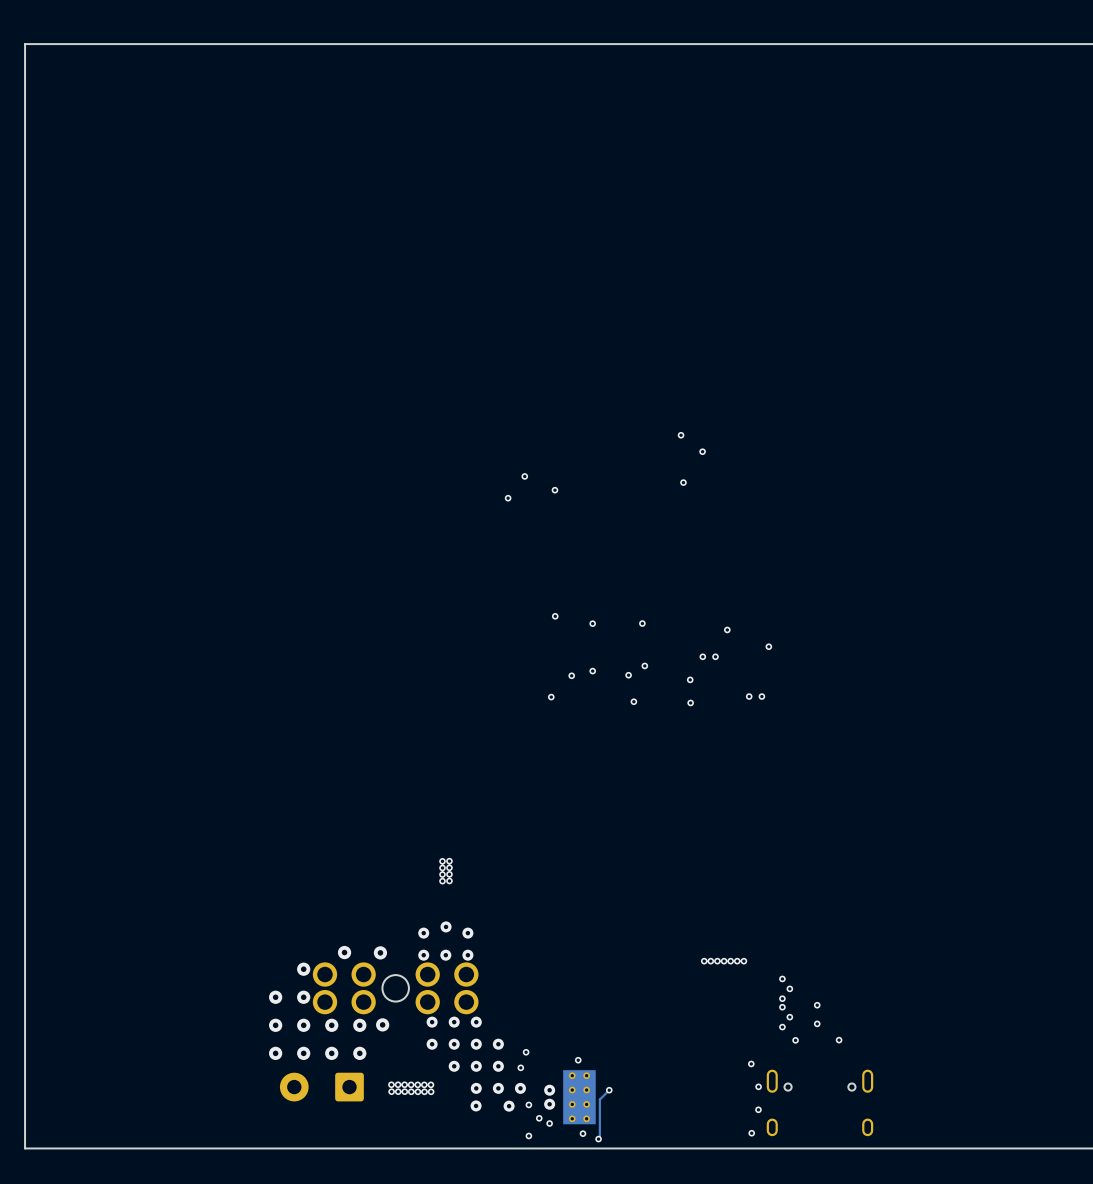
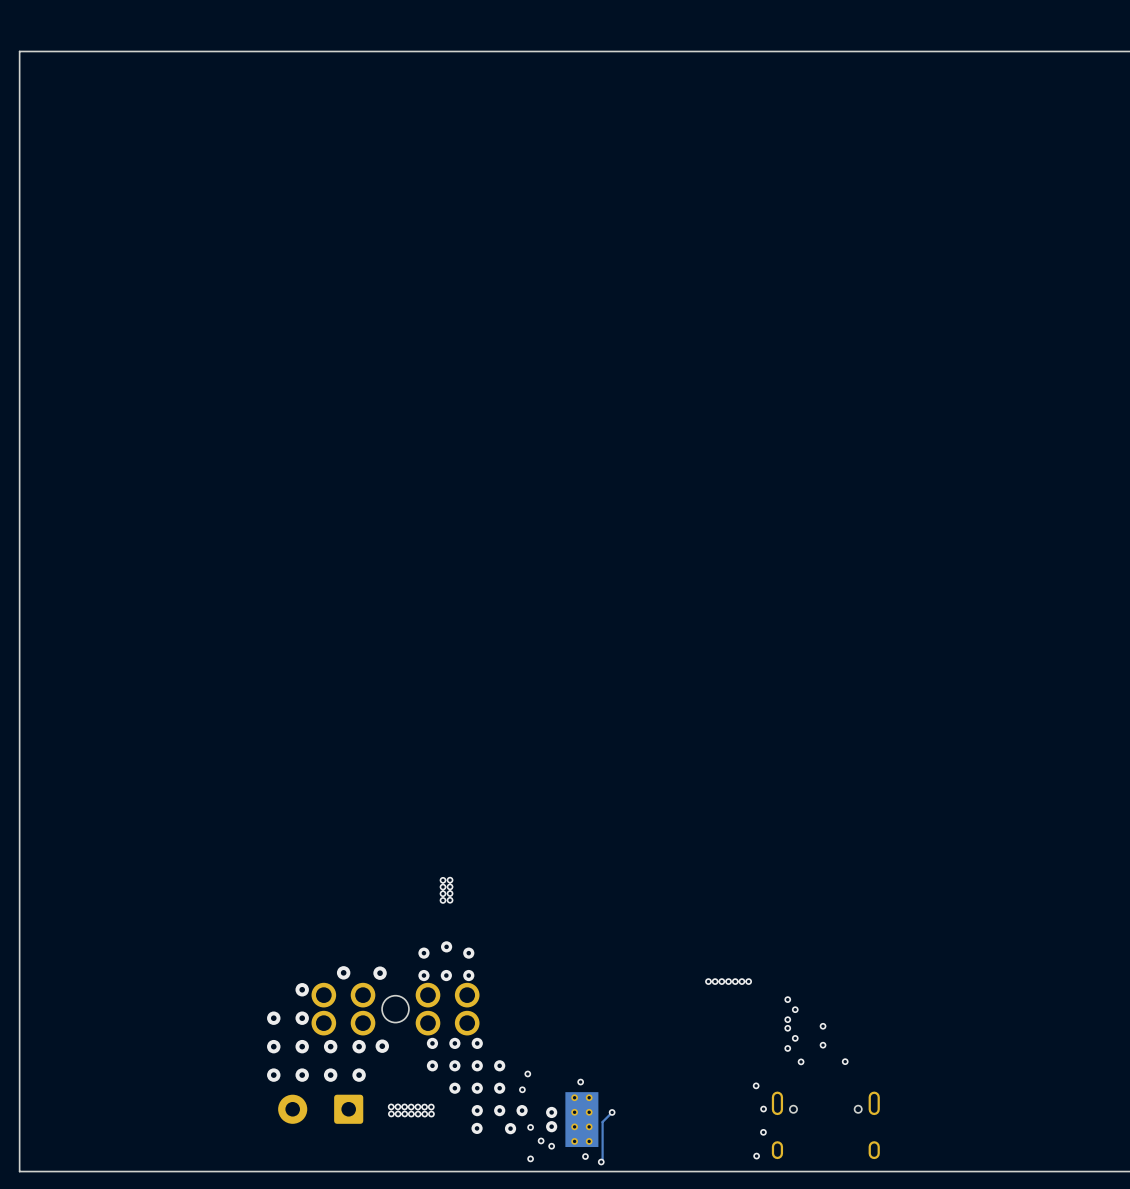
via: (681, 435) -> none
via: (702, 451) -> none
via: (524, 476) -> none
via: (683, 482) -> none
via: (554, 490) -> none
via: (508, 498) -> none
via: (555, 616) -> none
via: (592, 623) -> none
via: (642, 623) -> none
via: (727, 629) -> none
via: (768, 646) -> none
via: (702, 656) -> none
via: (715, 656) -> none
via: (644, 665) -> none
via: (592, 671) -> none
via: (571, 675) -> none
via: (628, 675) -> none
via: (690, 679) -> none
via: (749, 696) -> none
via: (761, 696) -> none
via: (551, 697) -> none
via: (633, 701) -> none
via: (690, 702) -> none

